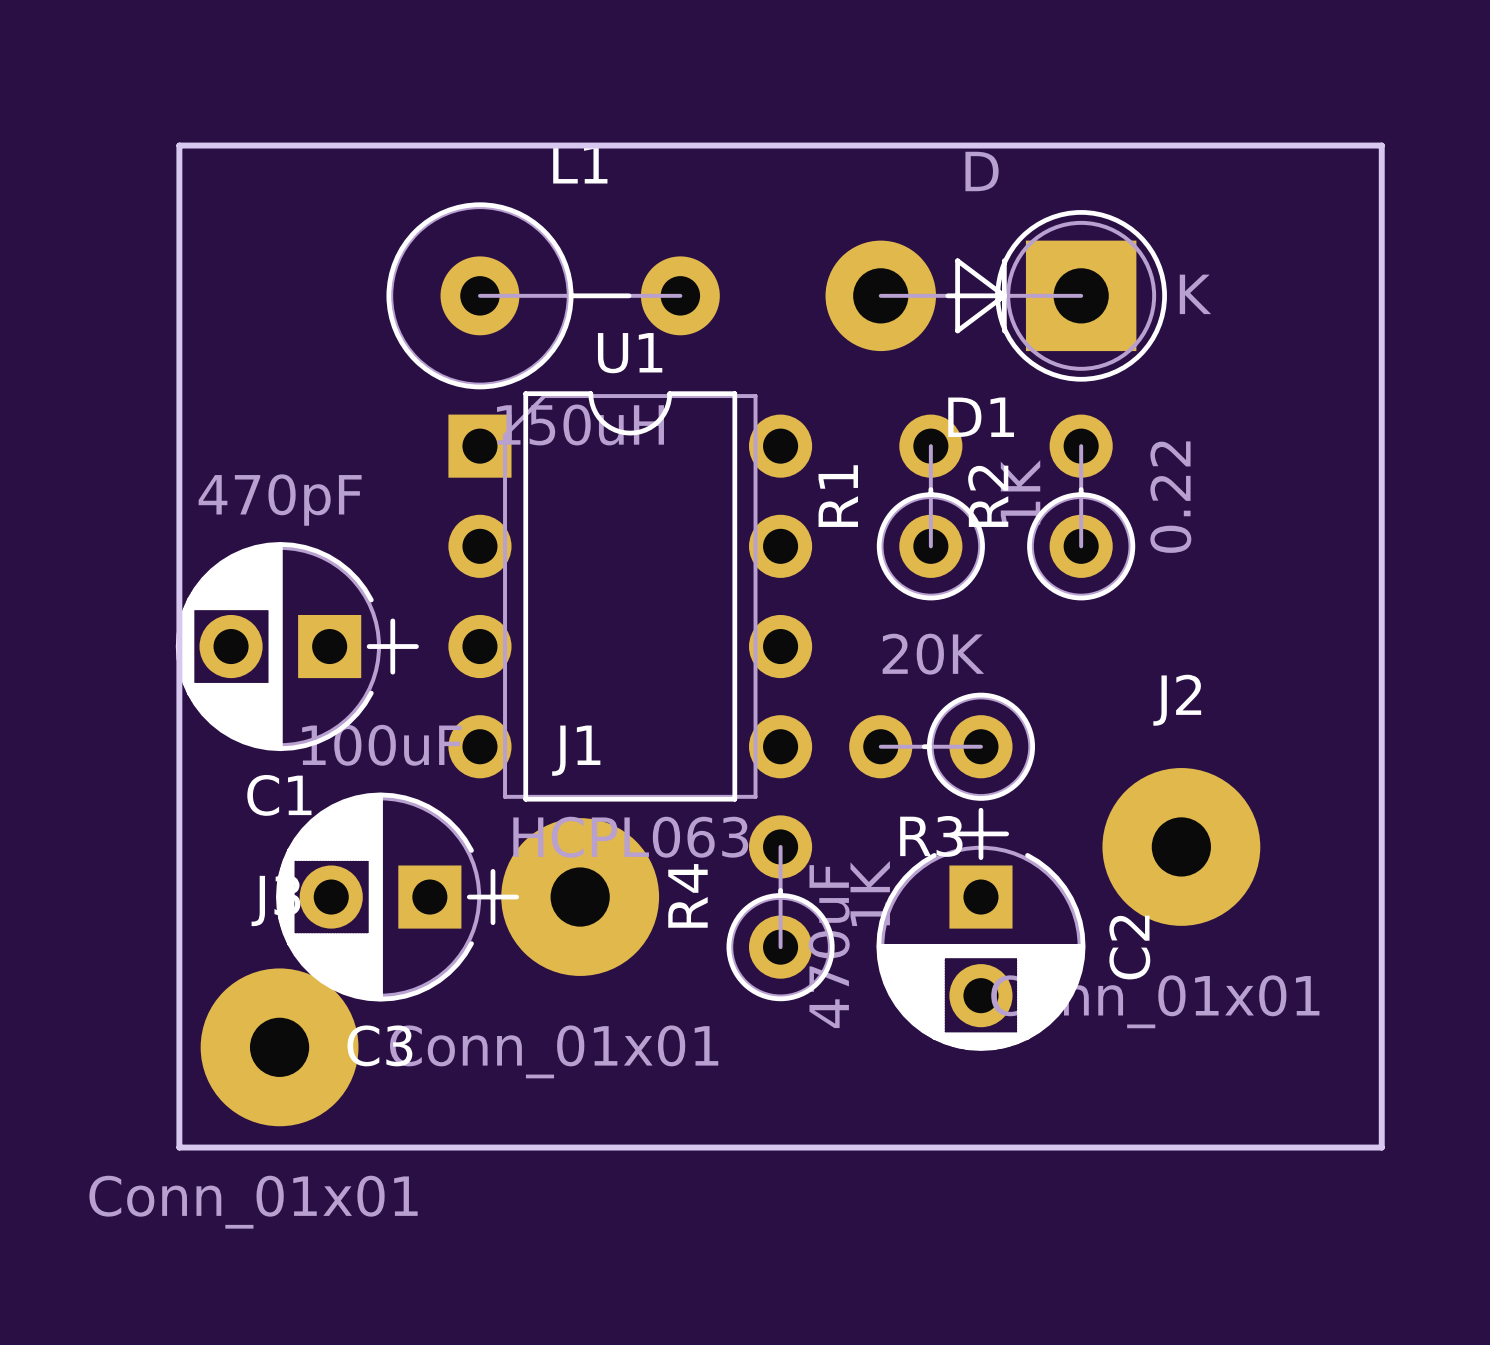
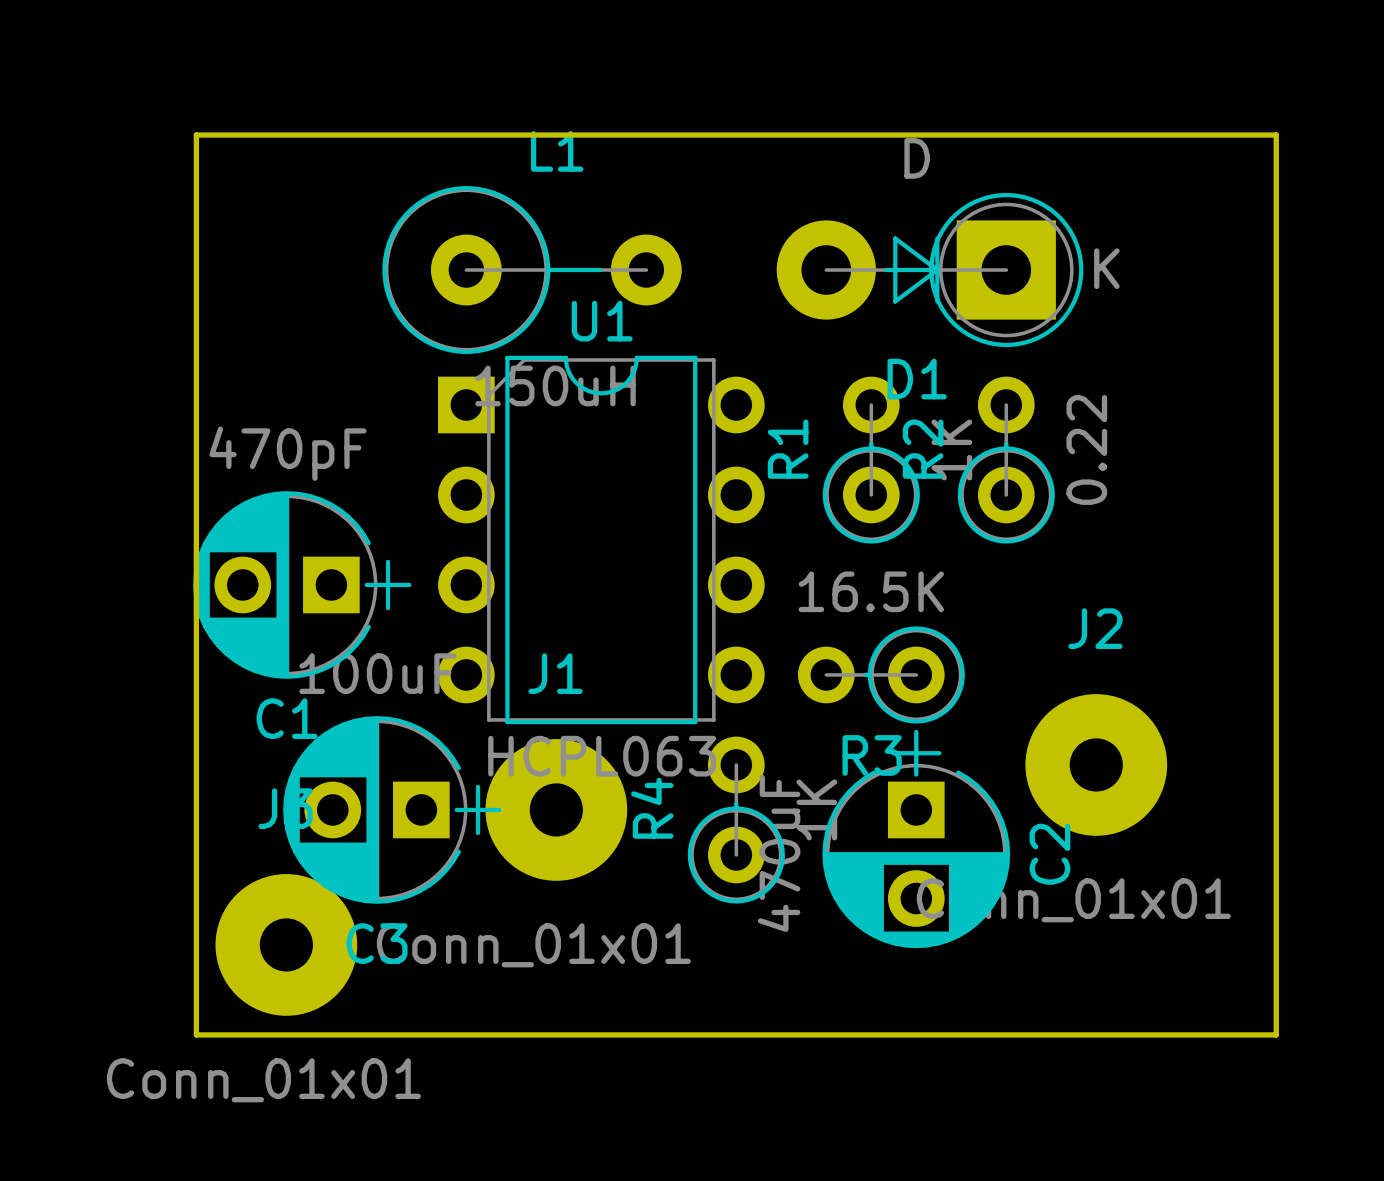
R3 value: 20K (933, 654) -> 16.5K (871, 591)

